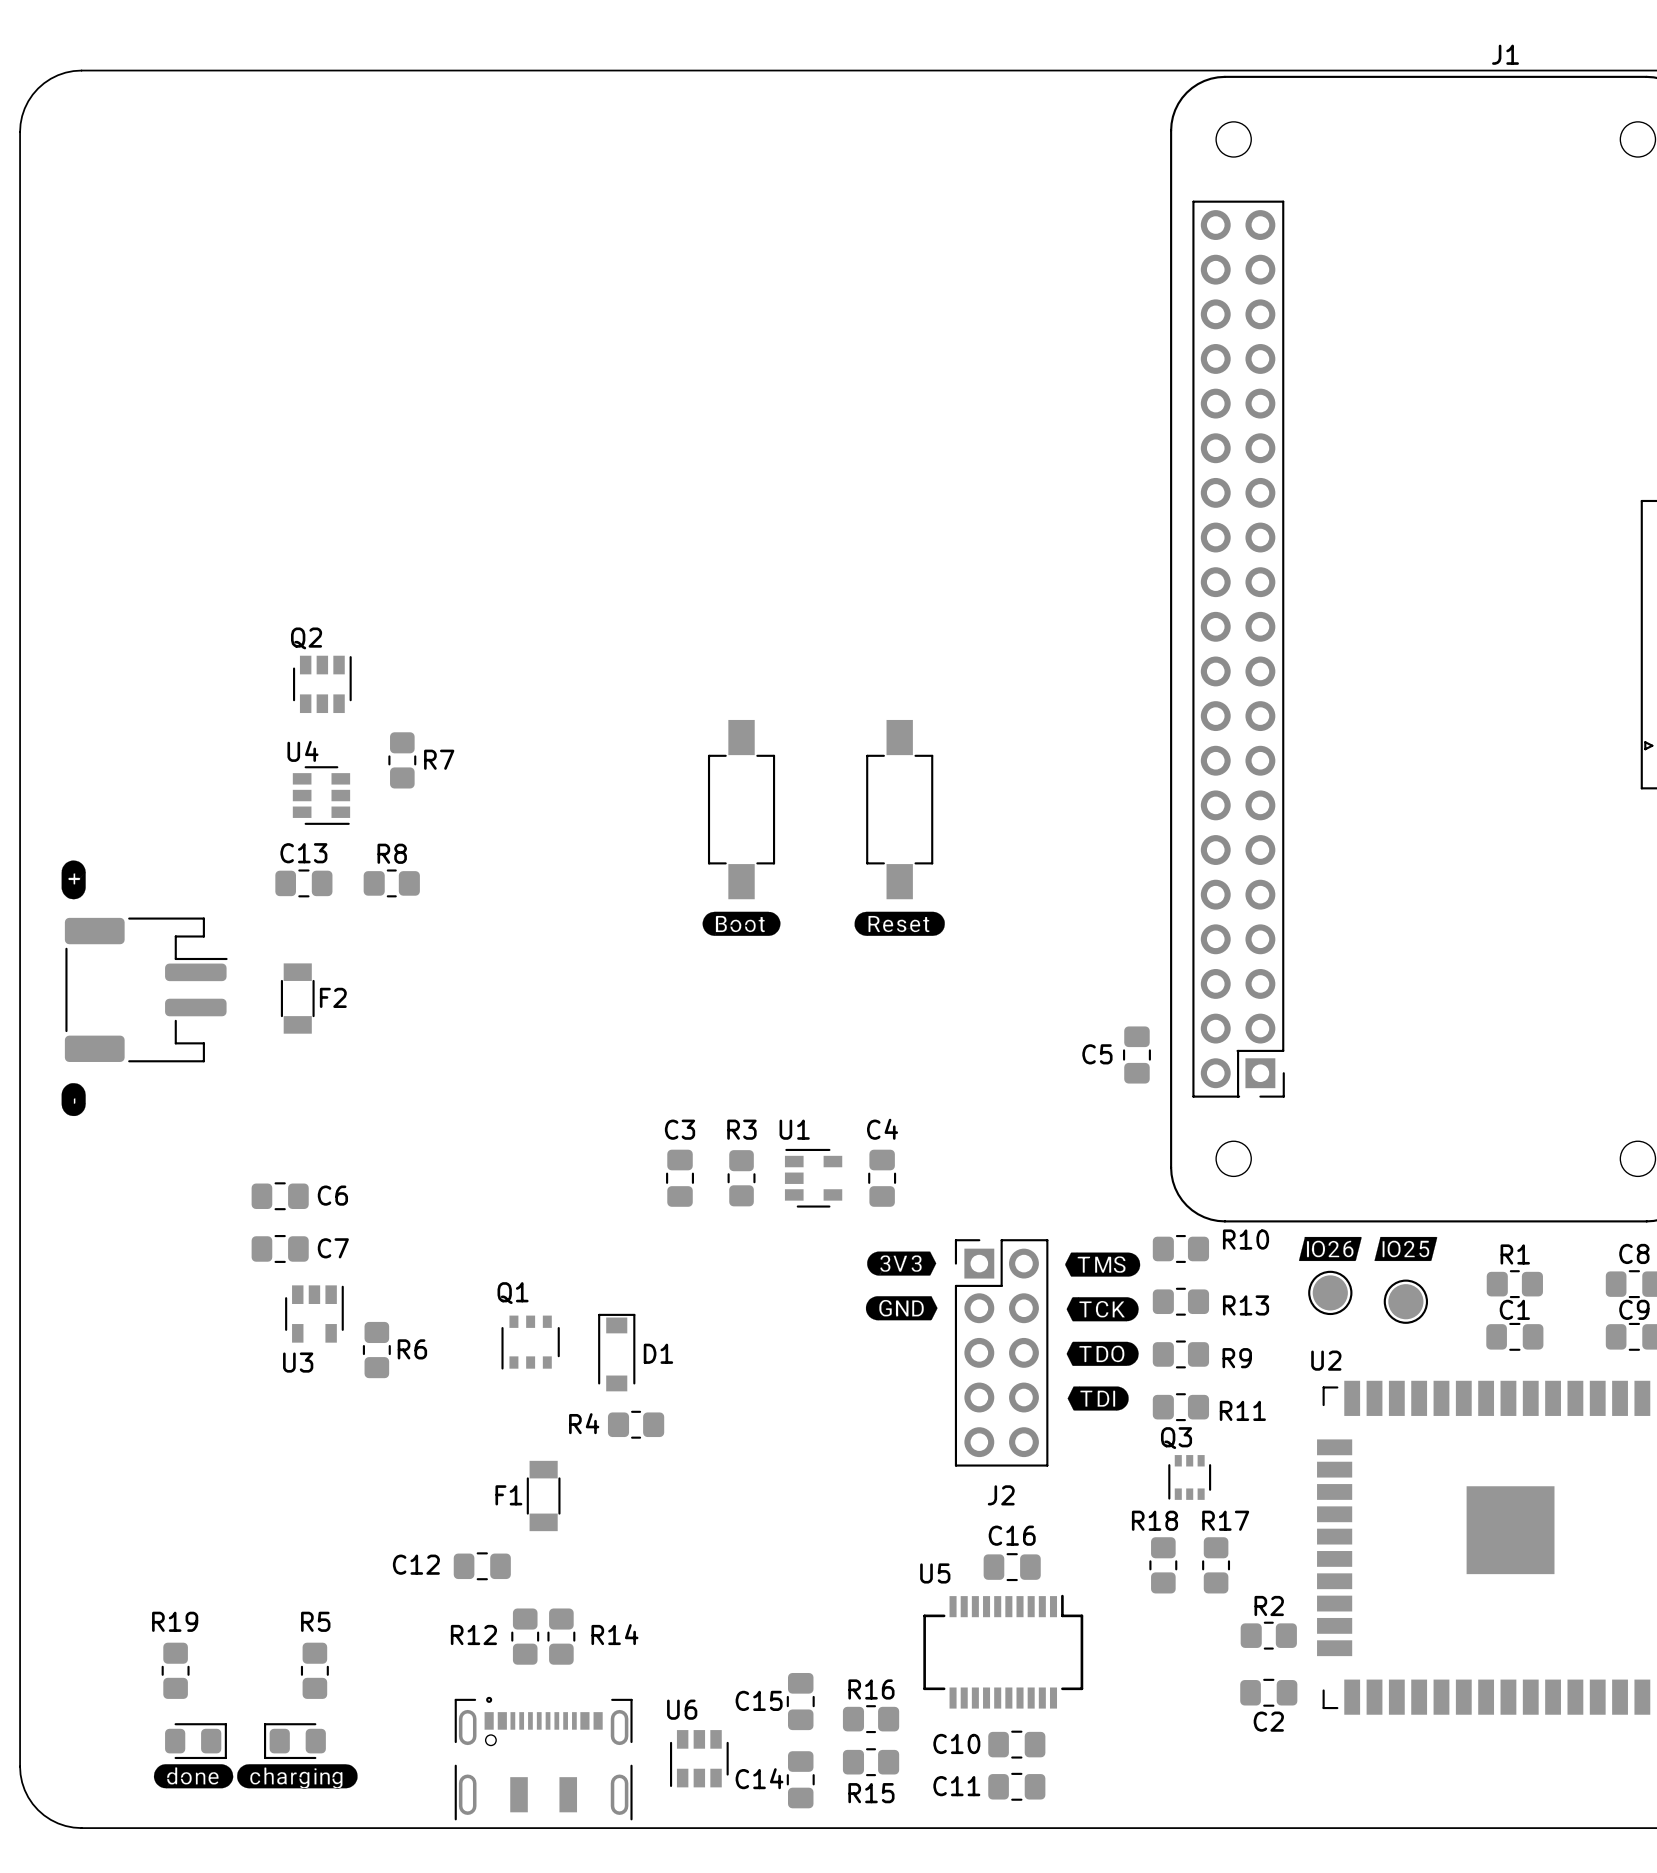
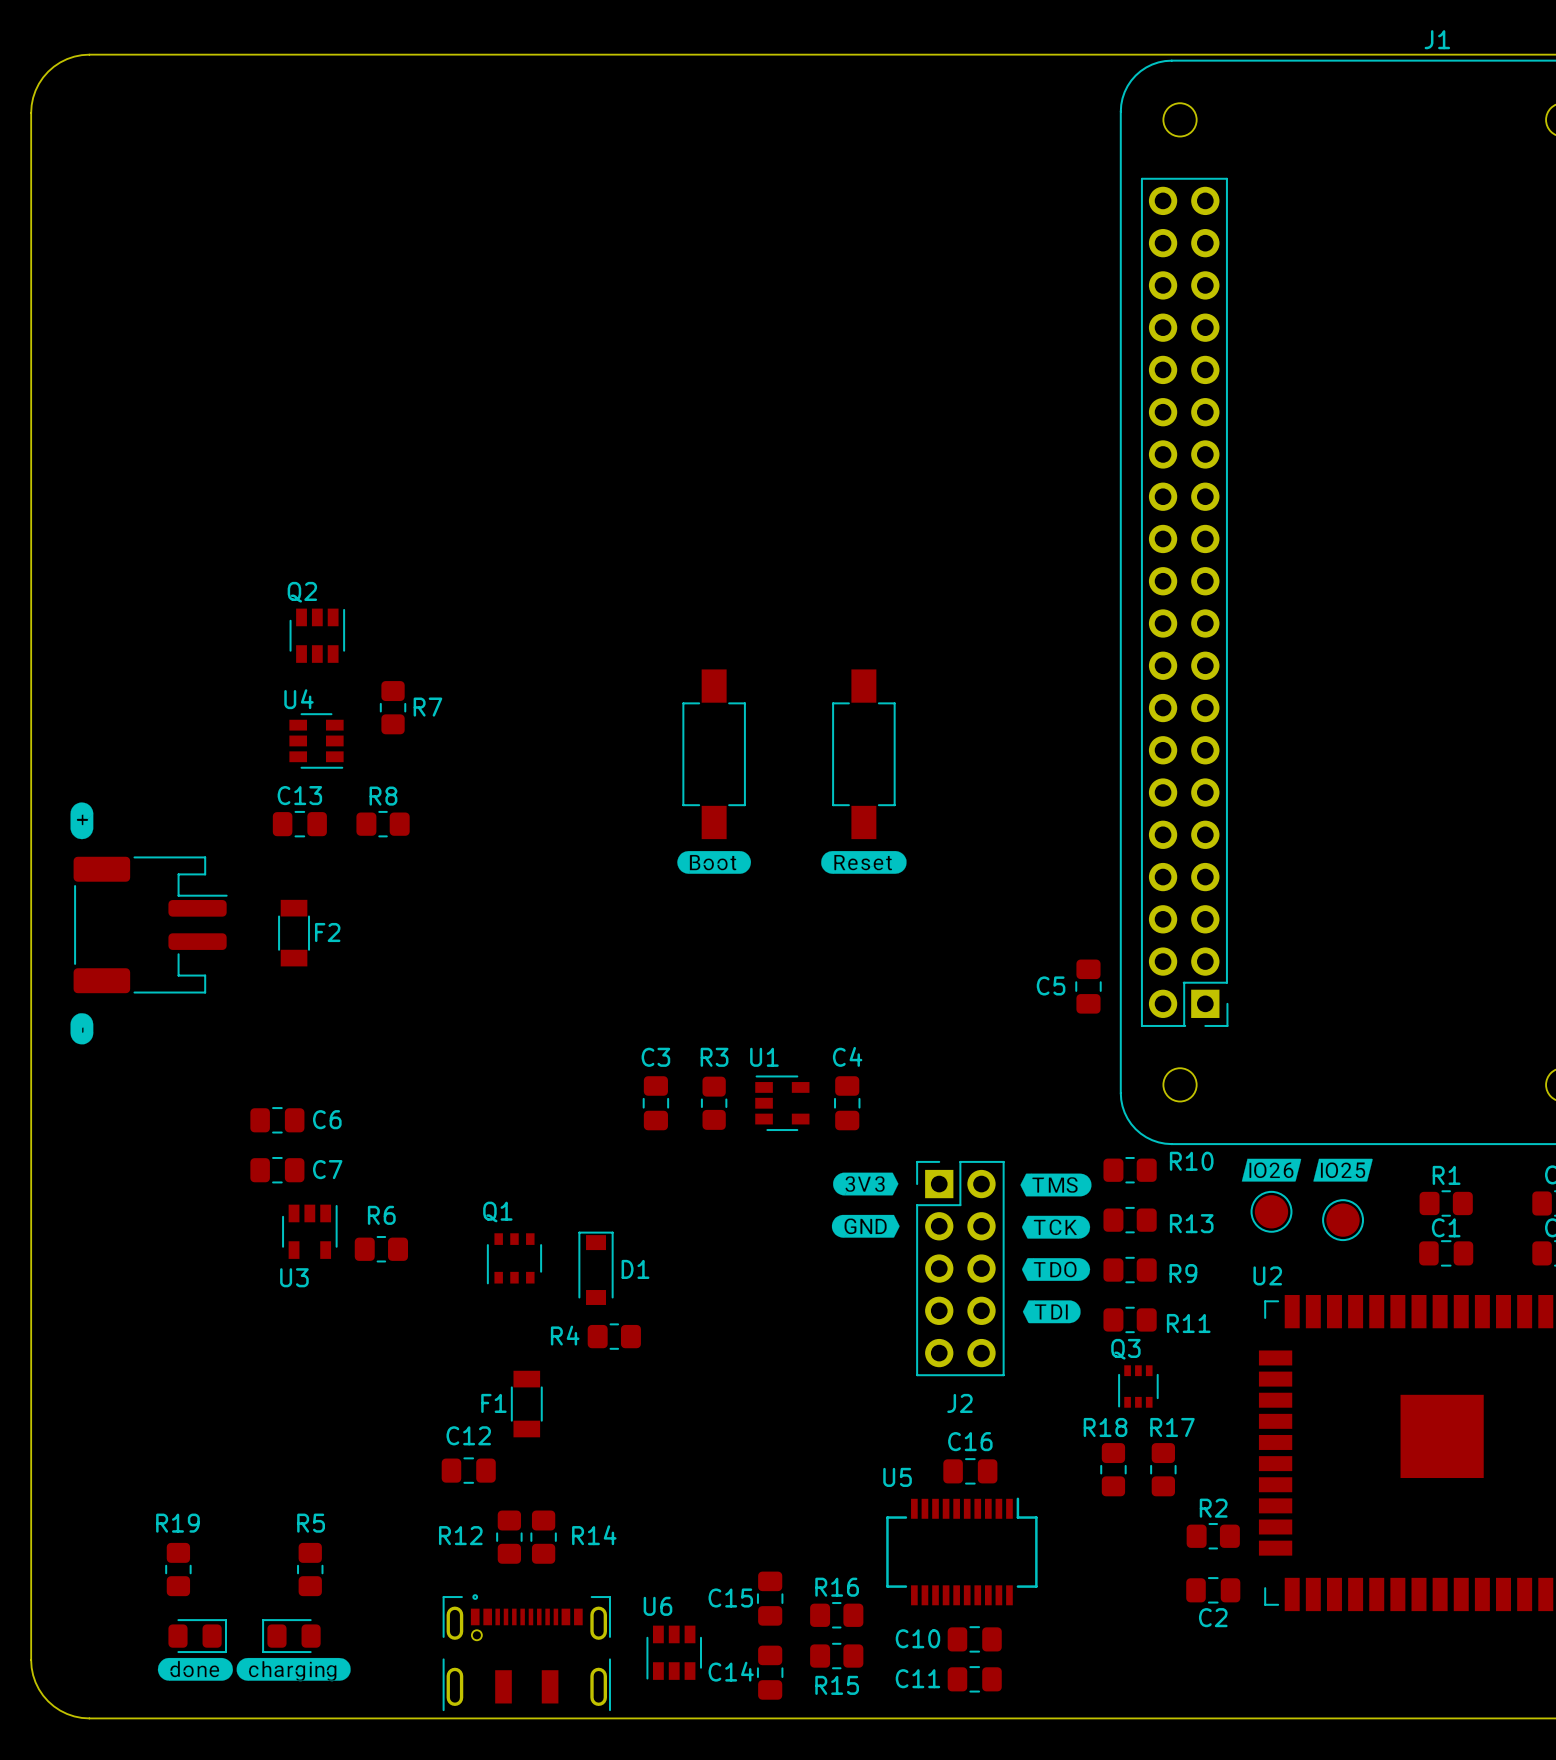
R6 name position: R6 (412, 1349) -> R6 (381, 1215)
R6 rotation: 0° (376, 1350) -> 90° clockwise (381, 1249)
C12 name position: C12 (416, 1564) -> C12 (468, 1435)

